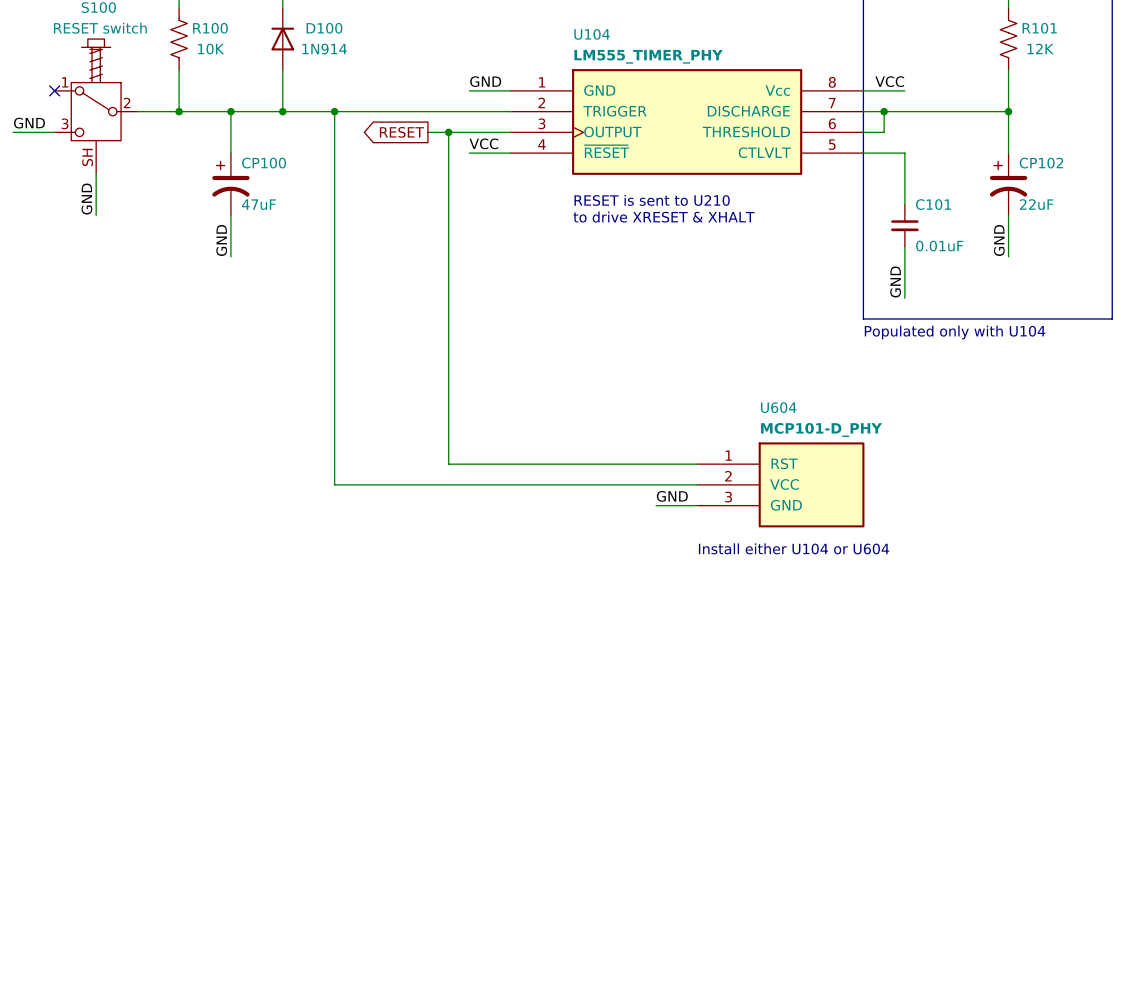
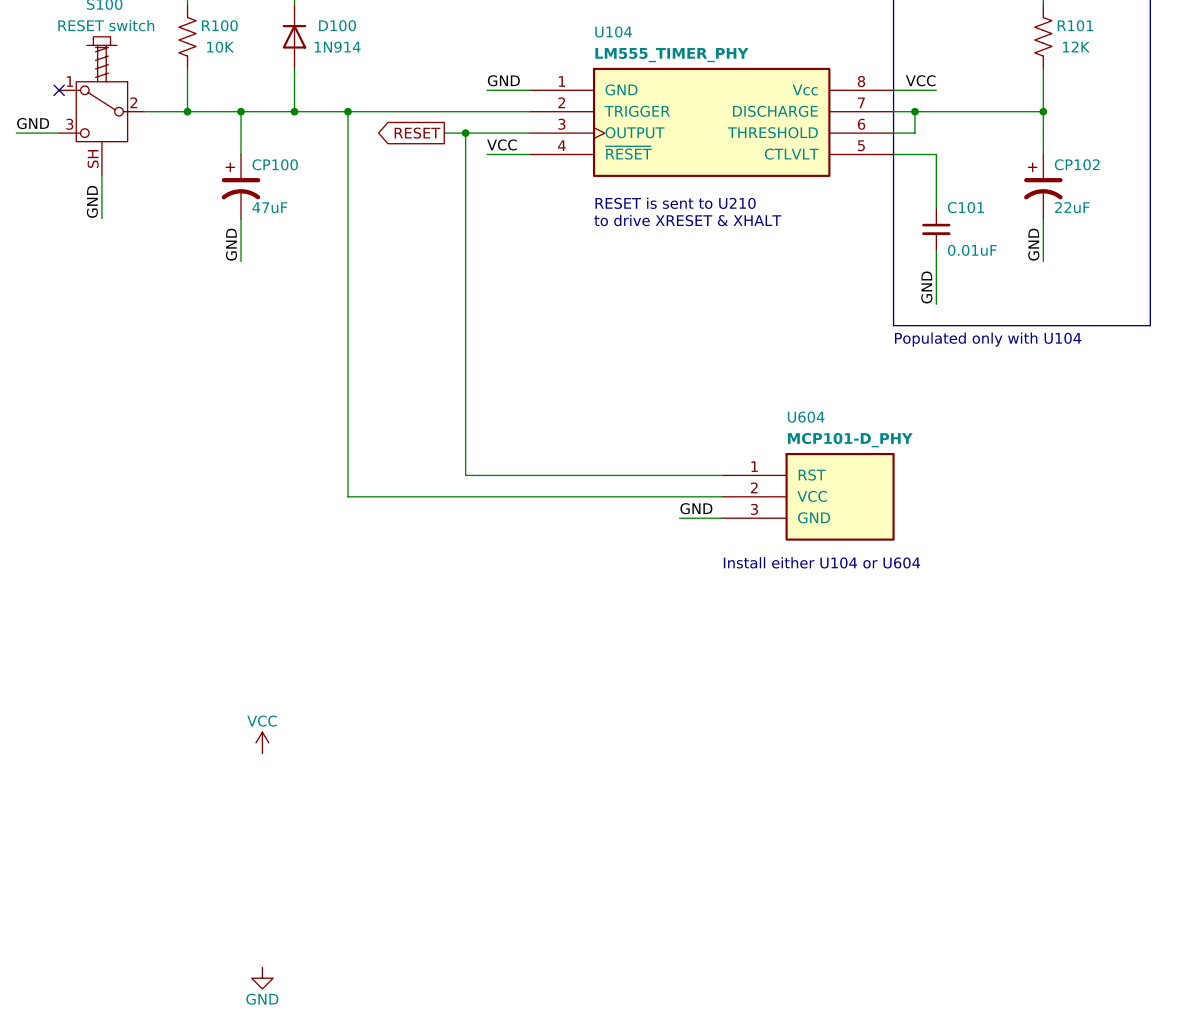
power symbol: none -> VCC (262, 742)
power symbol: none -> GND (262, 978)

